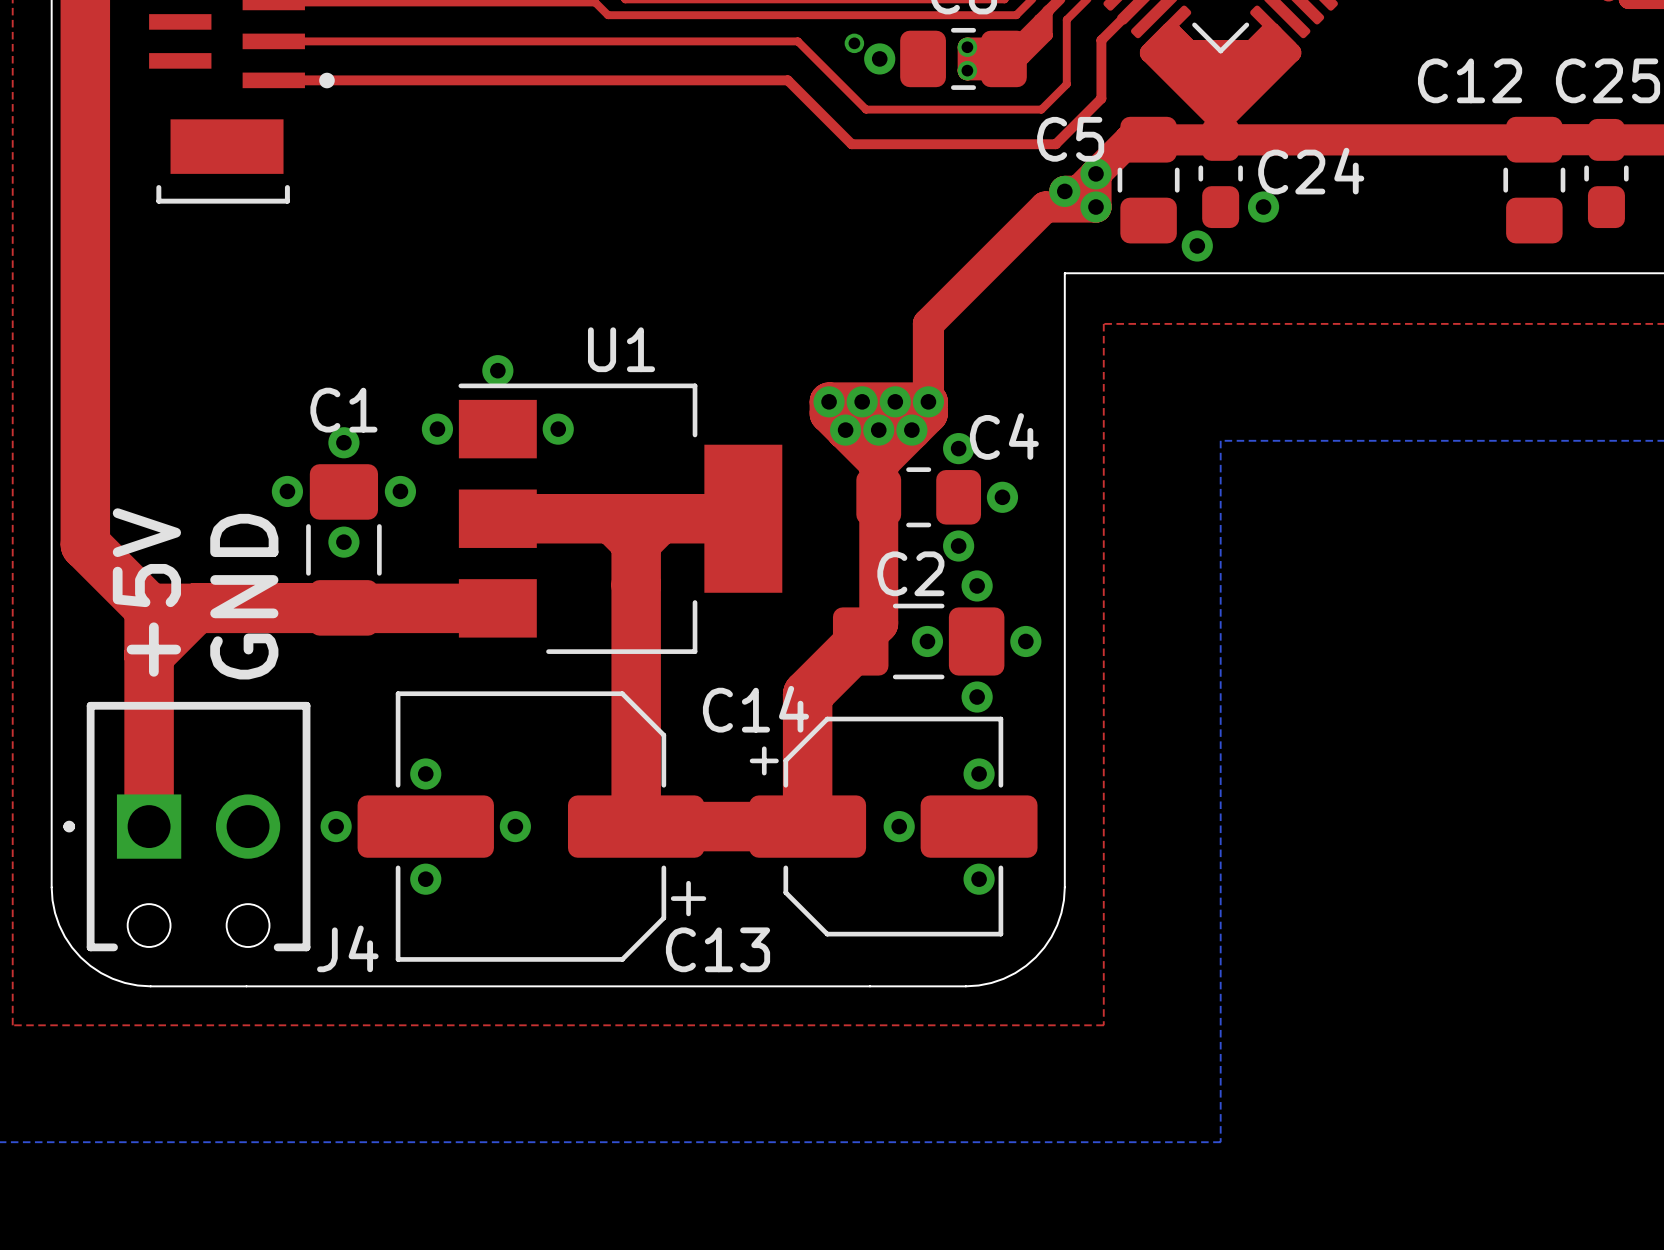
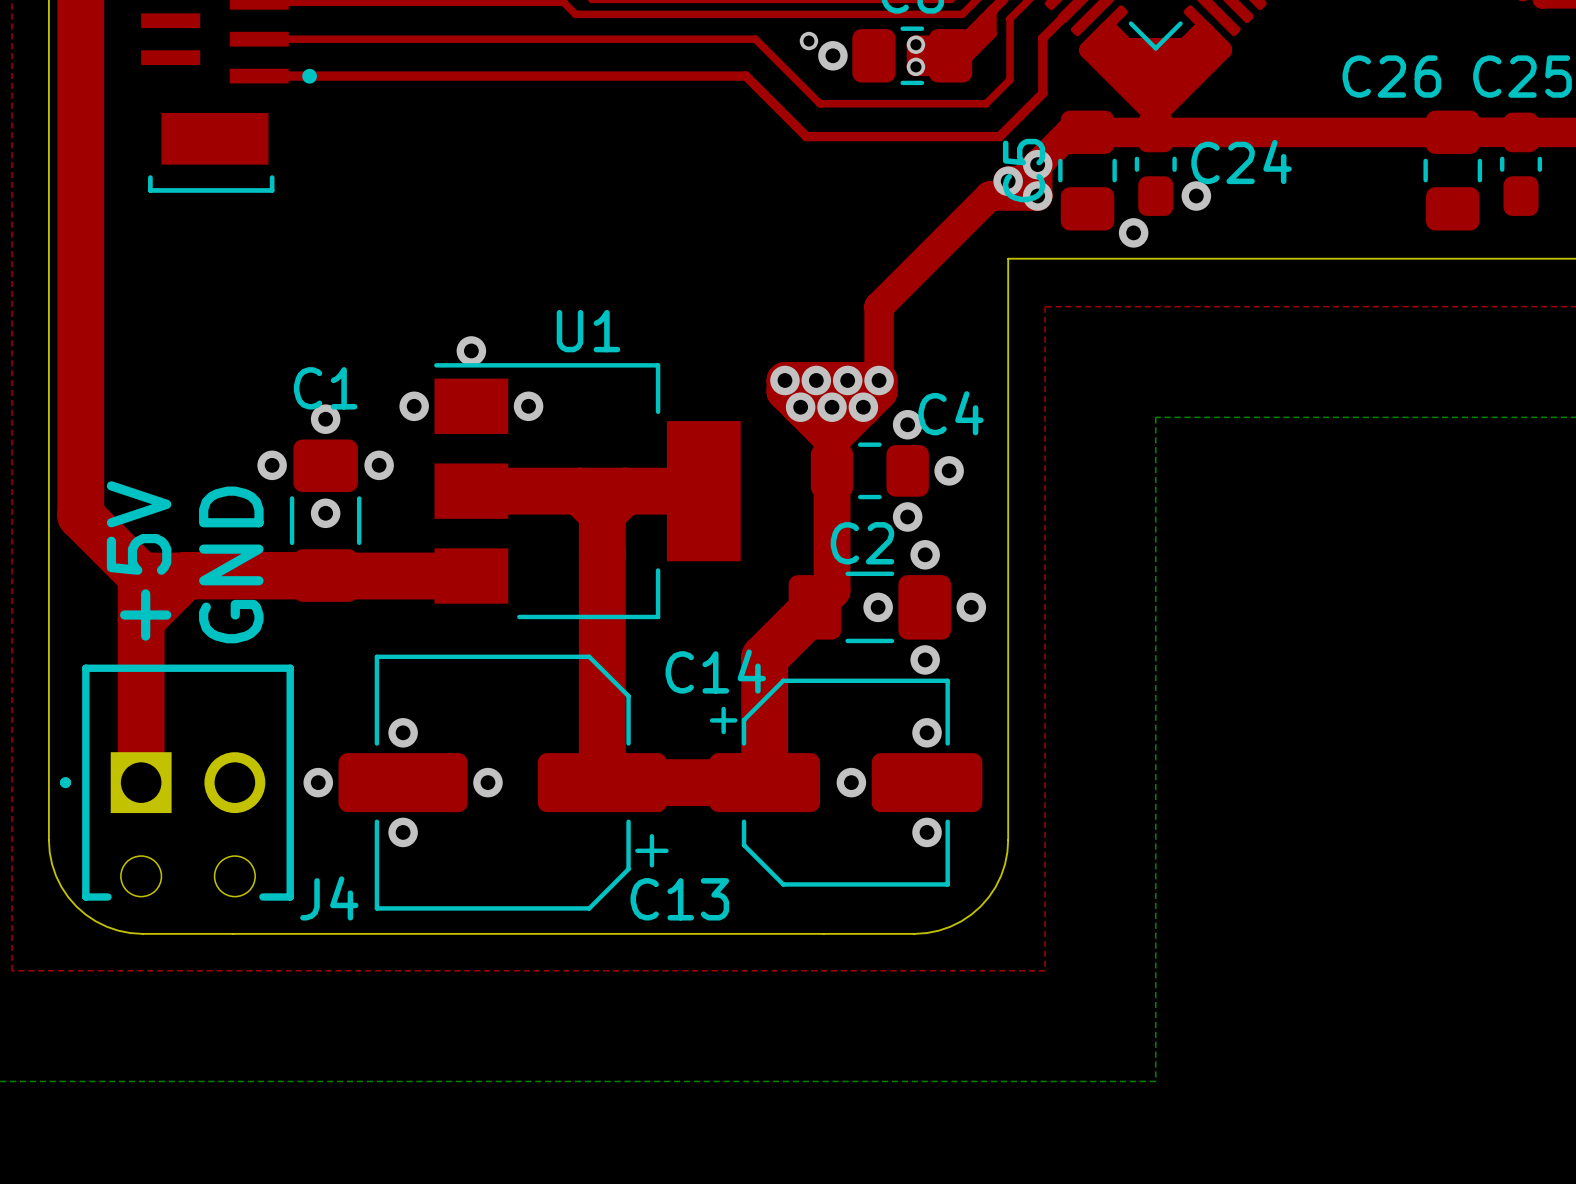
C12 name: C12 (1470, 80) -> C26 (1391, 76)
C5 name rotation: 0° (1070, 139) -> 90° counterclockwise (1024, 170)

